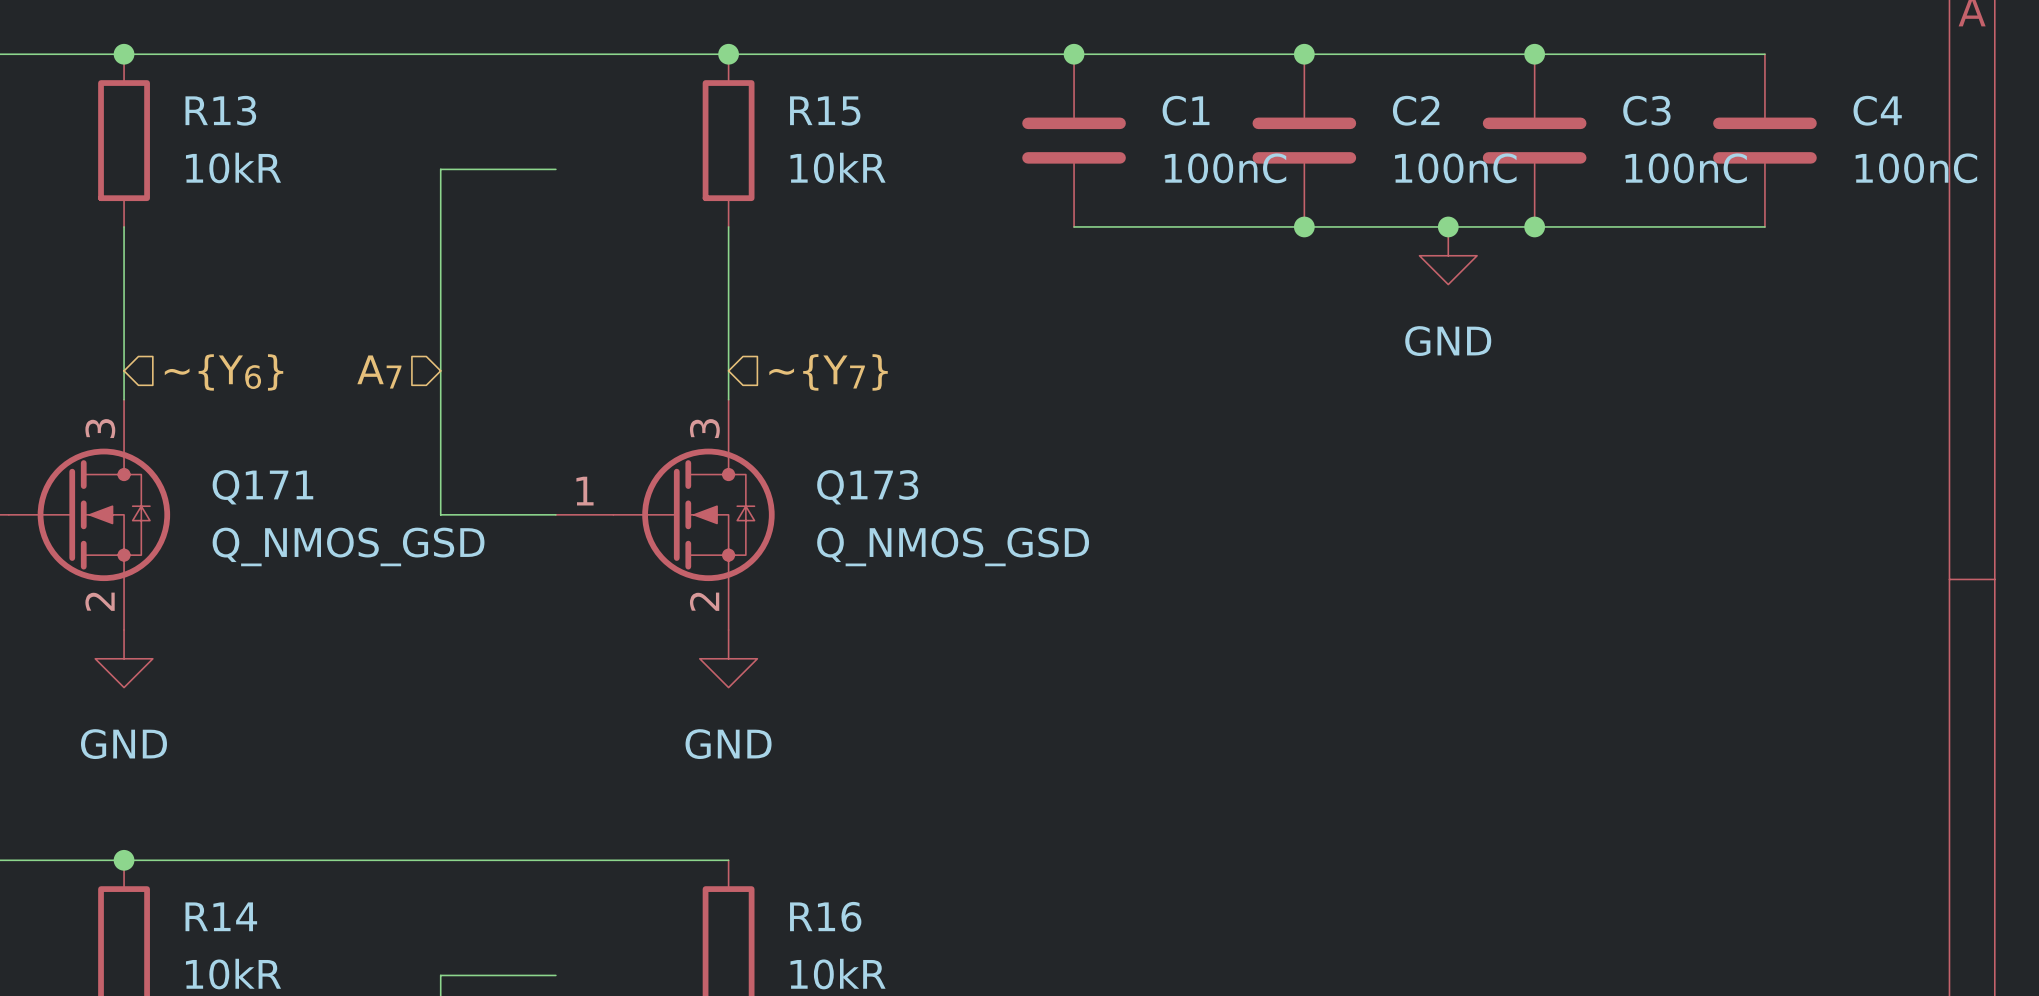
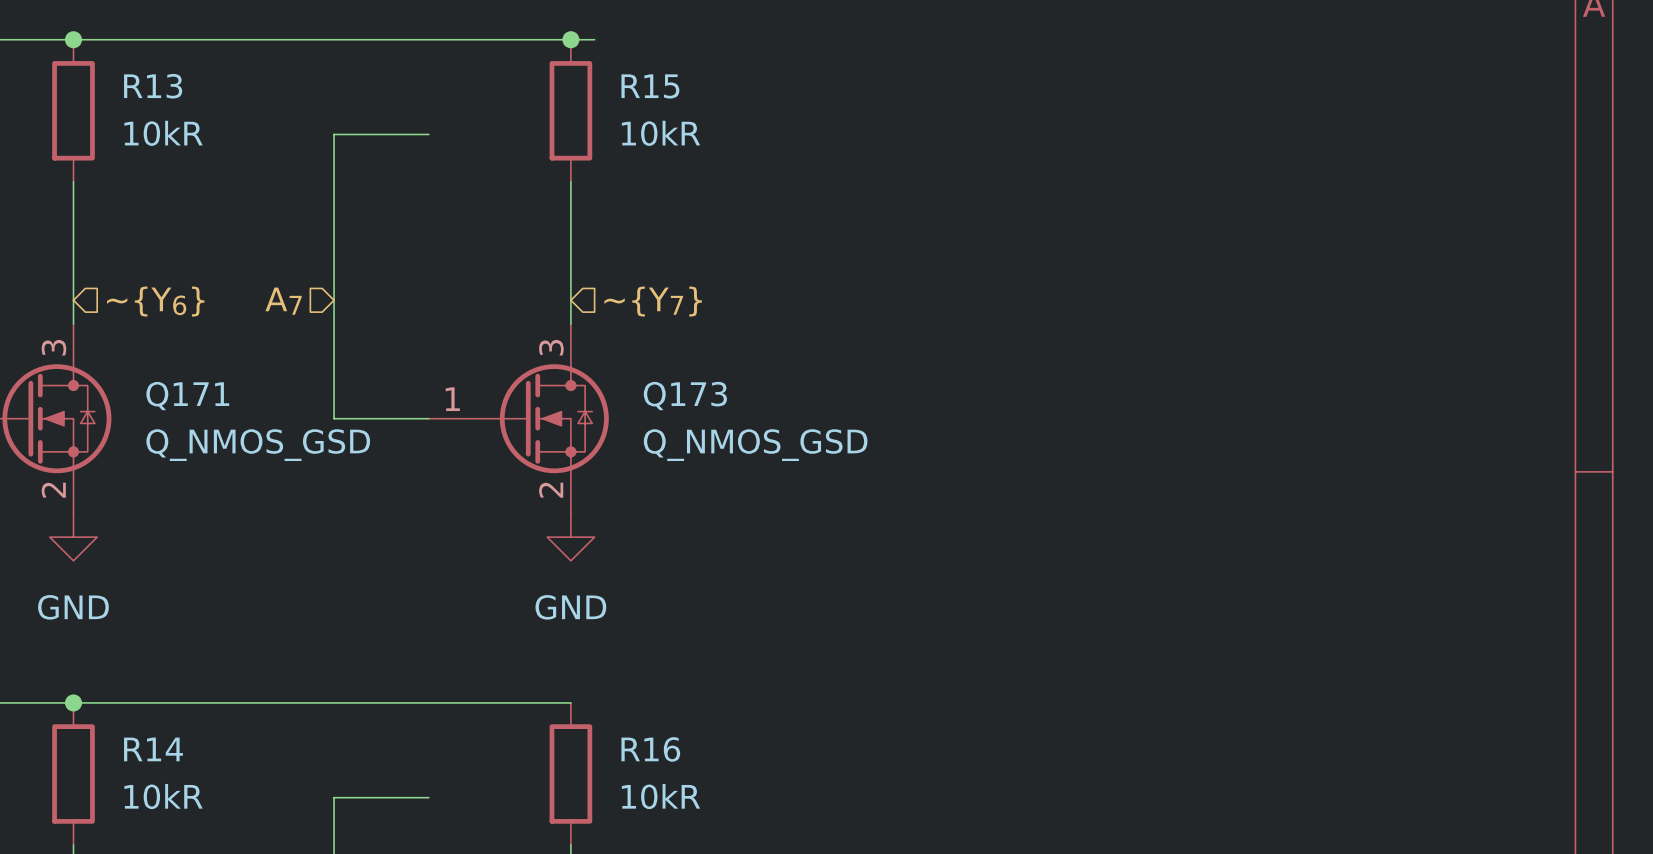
wire: (757, 54) (1764, 54) -> none
junction: (1074, 54) -> none
junction: (1304, 54) -> none
junction: (1534, 54) -> none
C1: 100nC (1074, 140) -> none
C2: 100nC (1304, 140) -> none
C3: 100nC (1534, 140) -> none
C4: 100nC (1764, 140) -> none
wire: (1074, 226) (1764, 226) -> none
junction: (1304, 226) -> none
junction: (1448, 226) -> none
junction: (1534, 226) -> none
power symbol: GND (1448, 255) -> none

